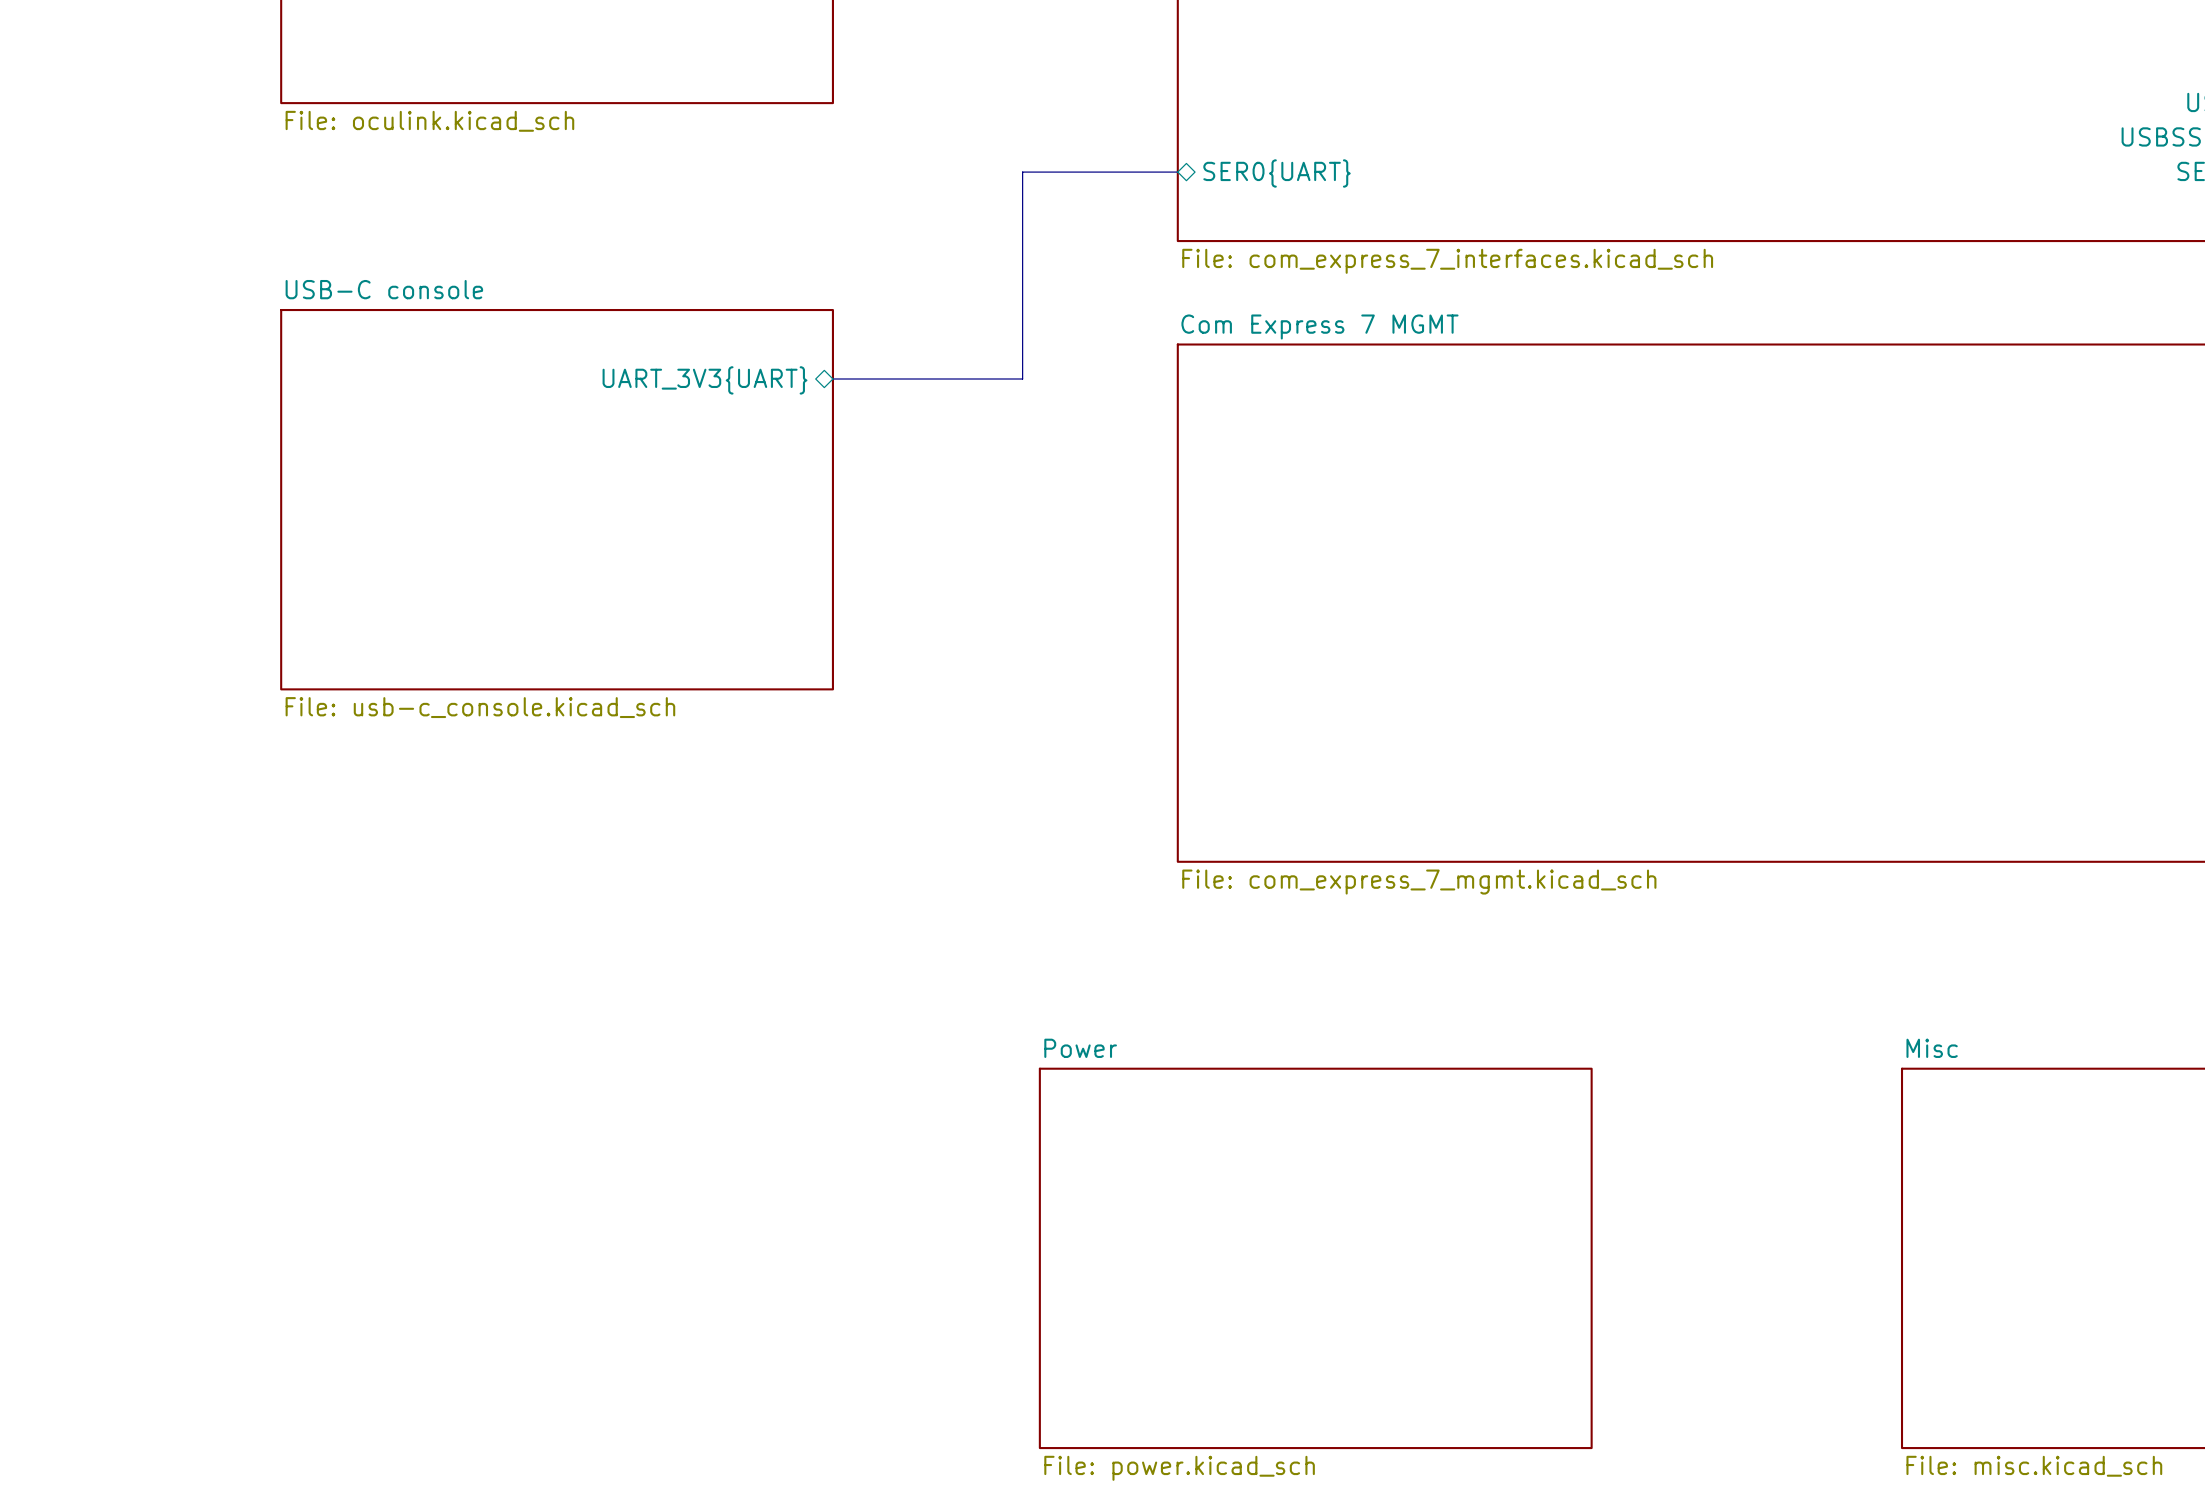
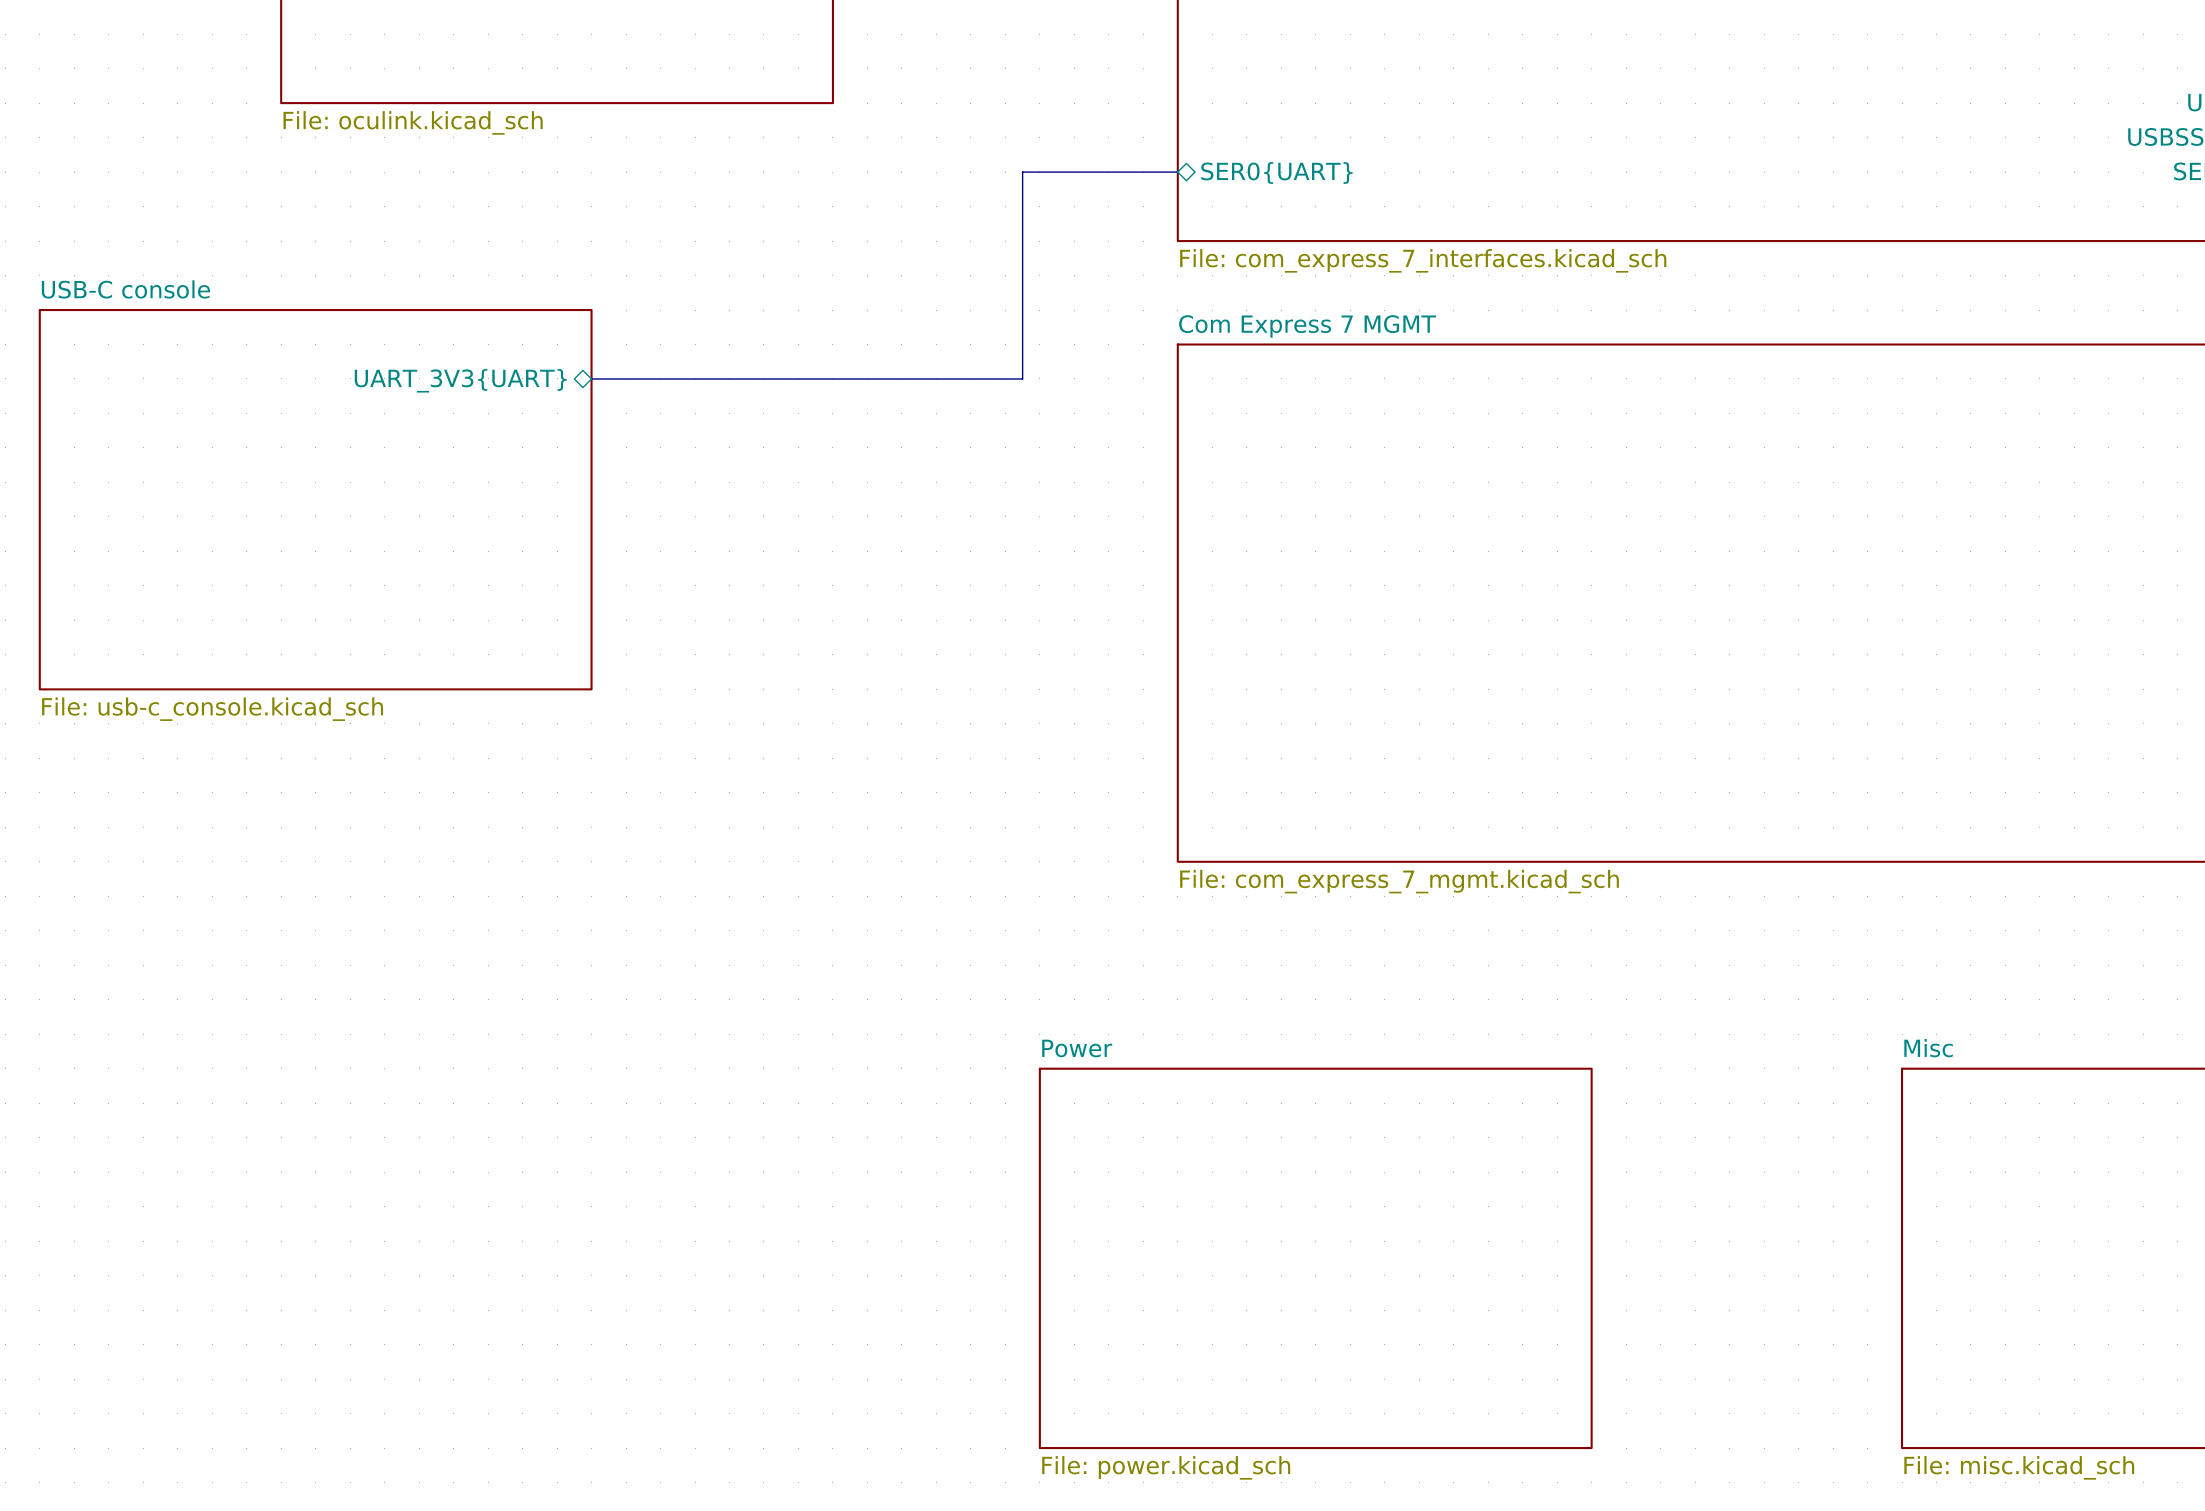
bus: none -> (591, 378) (832, 378)
sheet pin position: UART_3V3{UART} (705, 380) -> UART_3V3{UART} (460, 380)
sheet USB-C console position: (557, 499) -> (315, 499)

